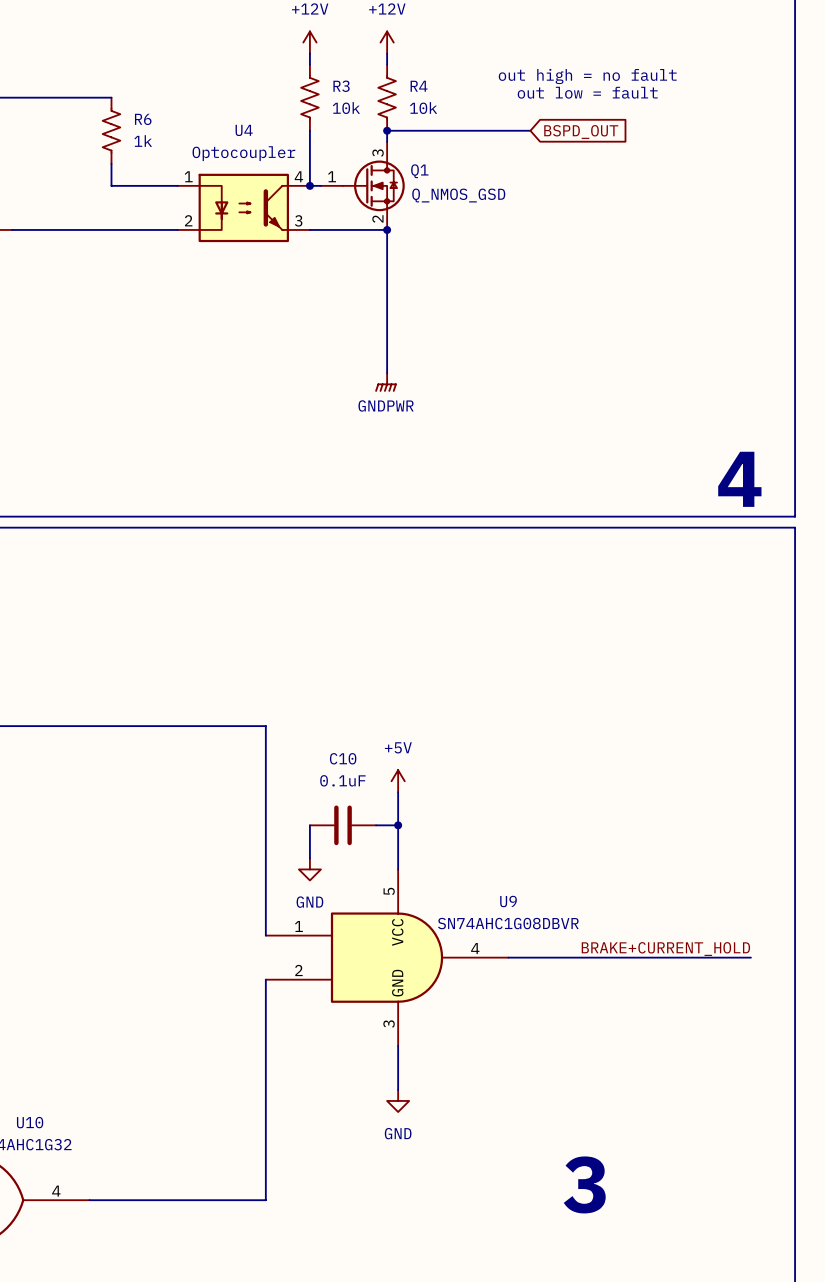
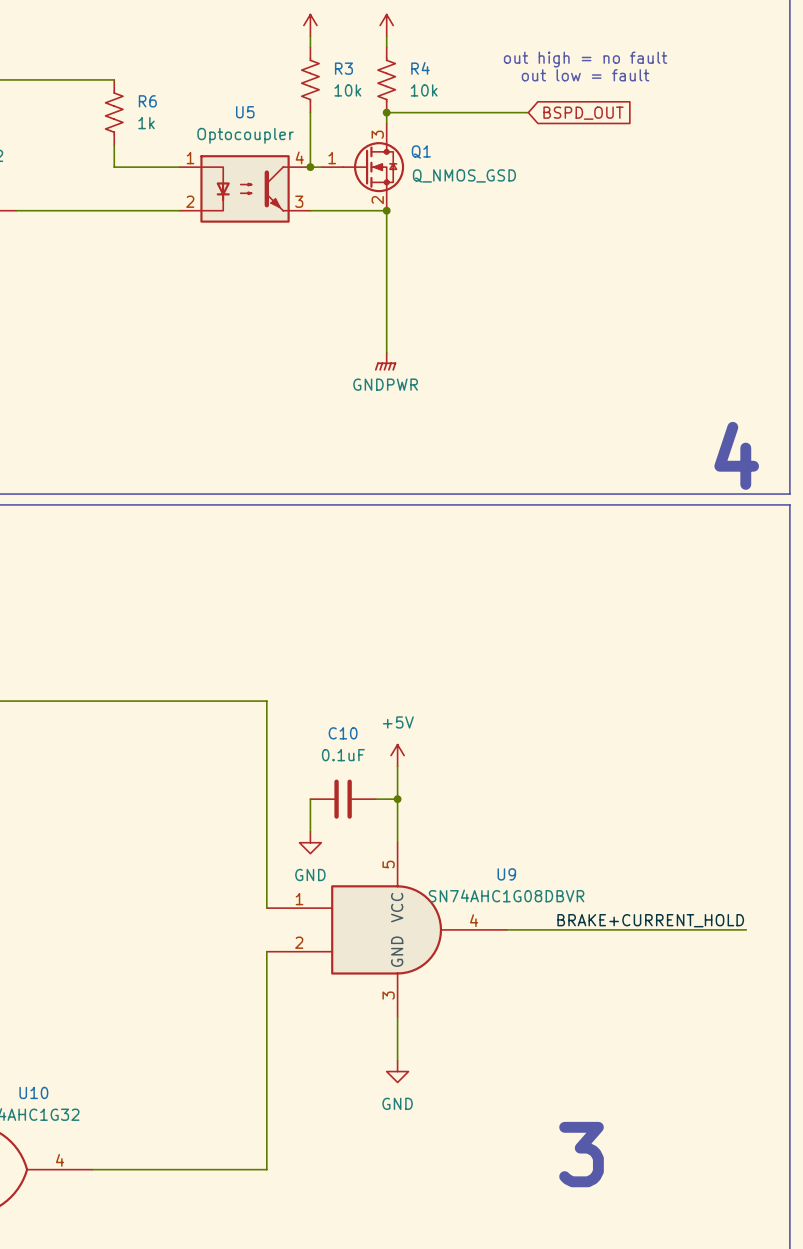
U4 name: U4 (244, 130) -> U5 (245, 112)

